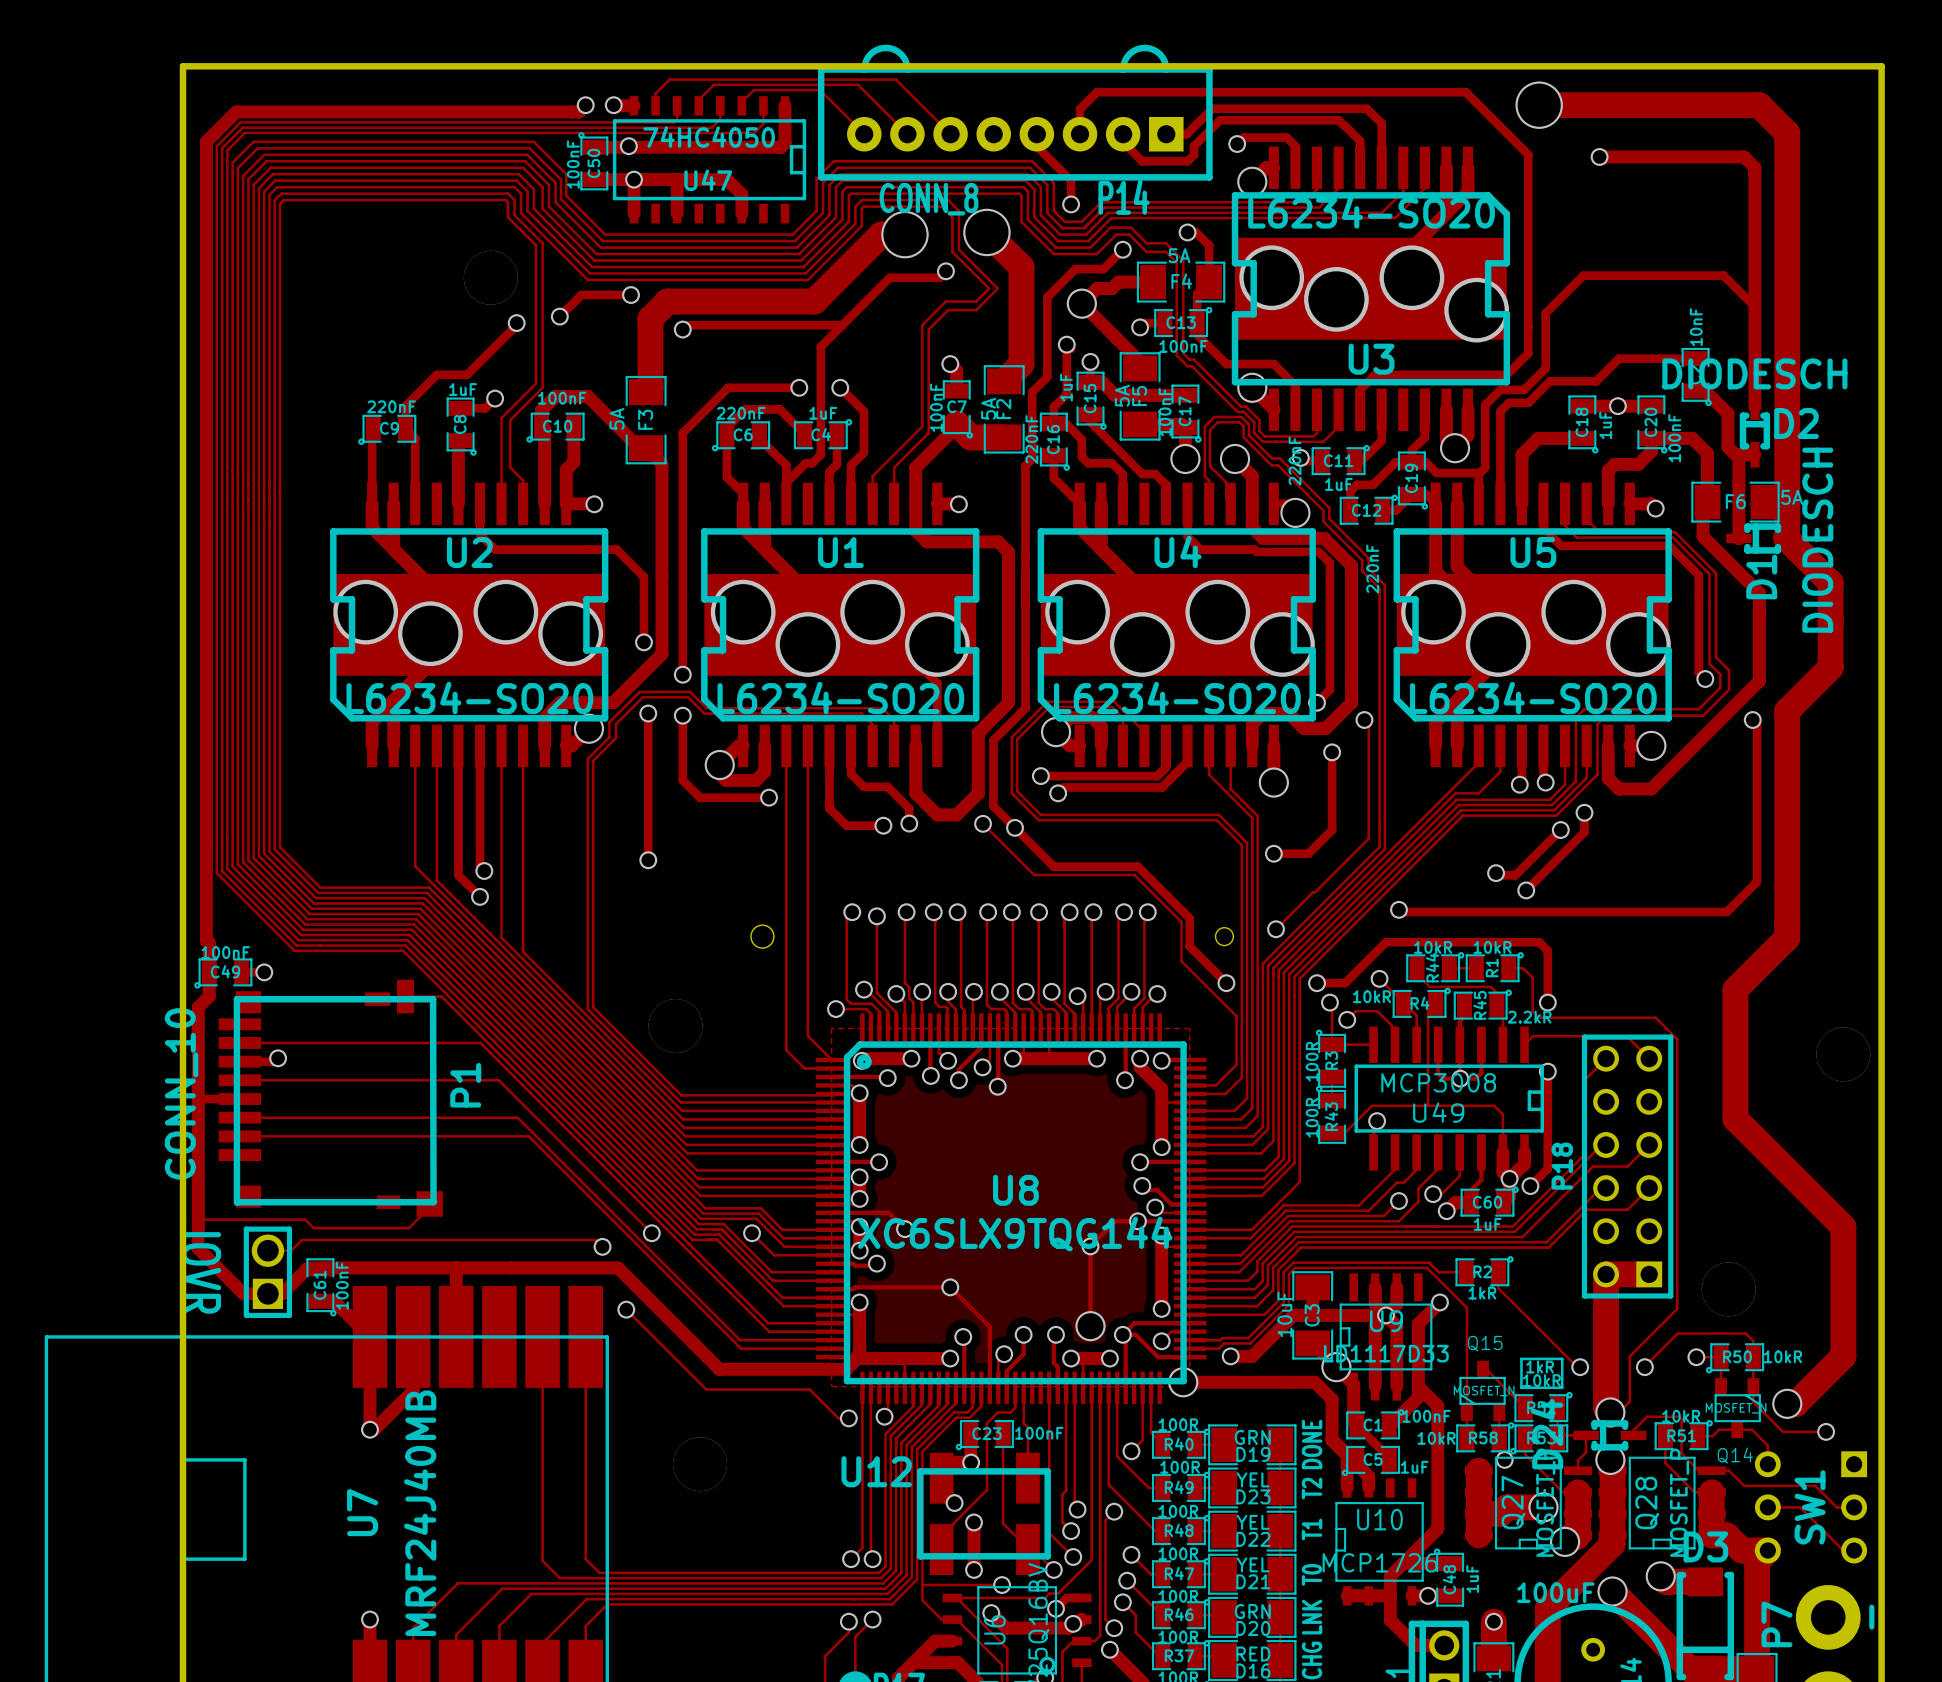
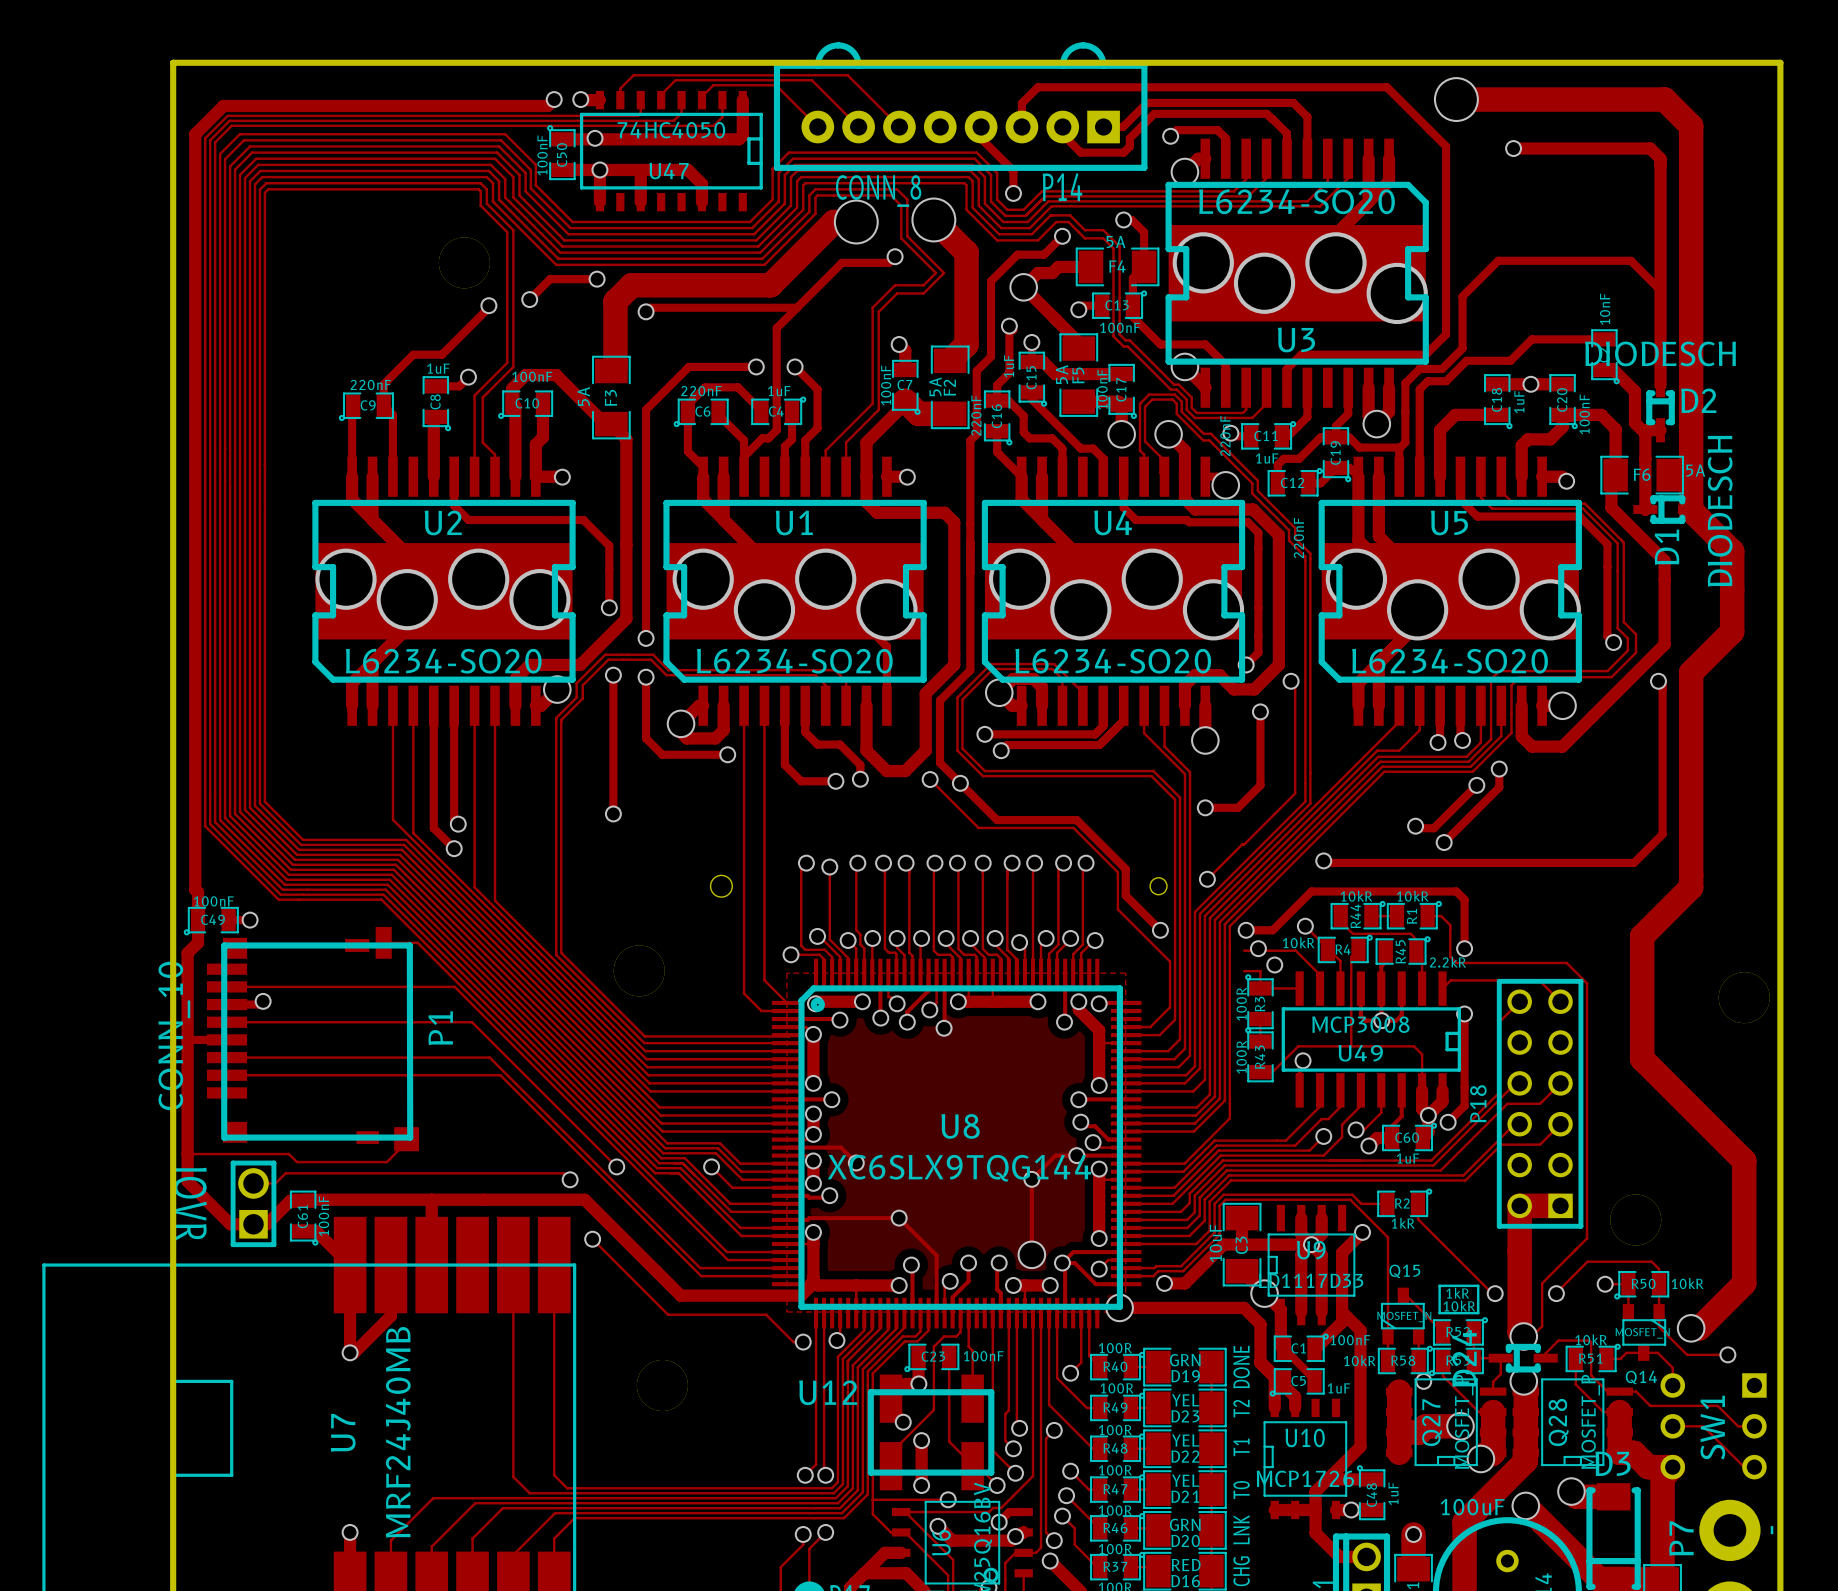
track: (1329, 1002) (1332, 1004) (1332, 1026) -> (1244, 971) (1260, 971)
track: (1347, 1019) (1355, 1011) (1377, 1011) (1395, 1030) -> (1244, 950) (1295, 950) (1320, 975)

